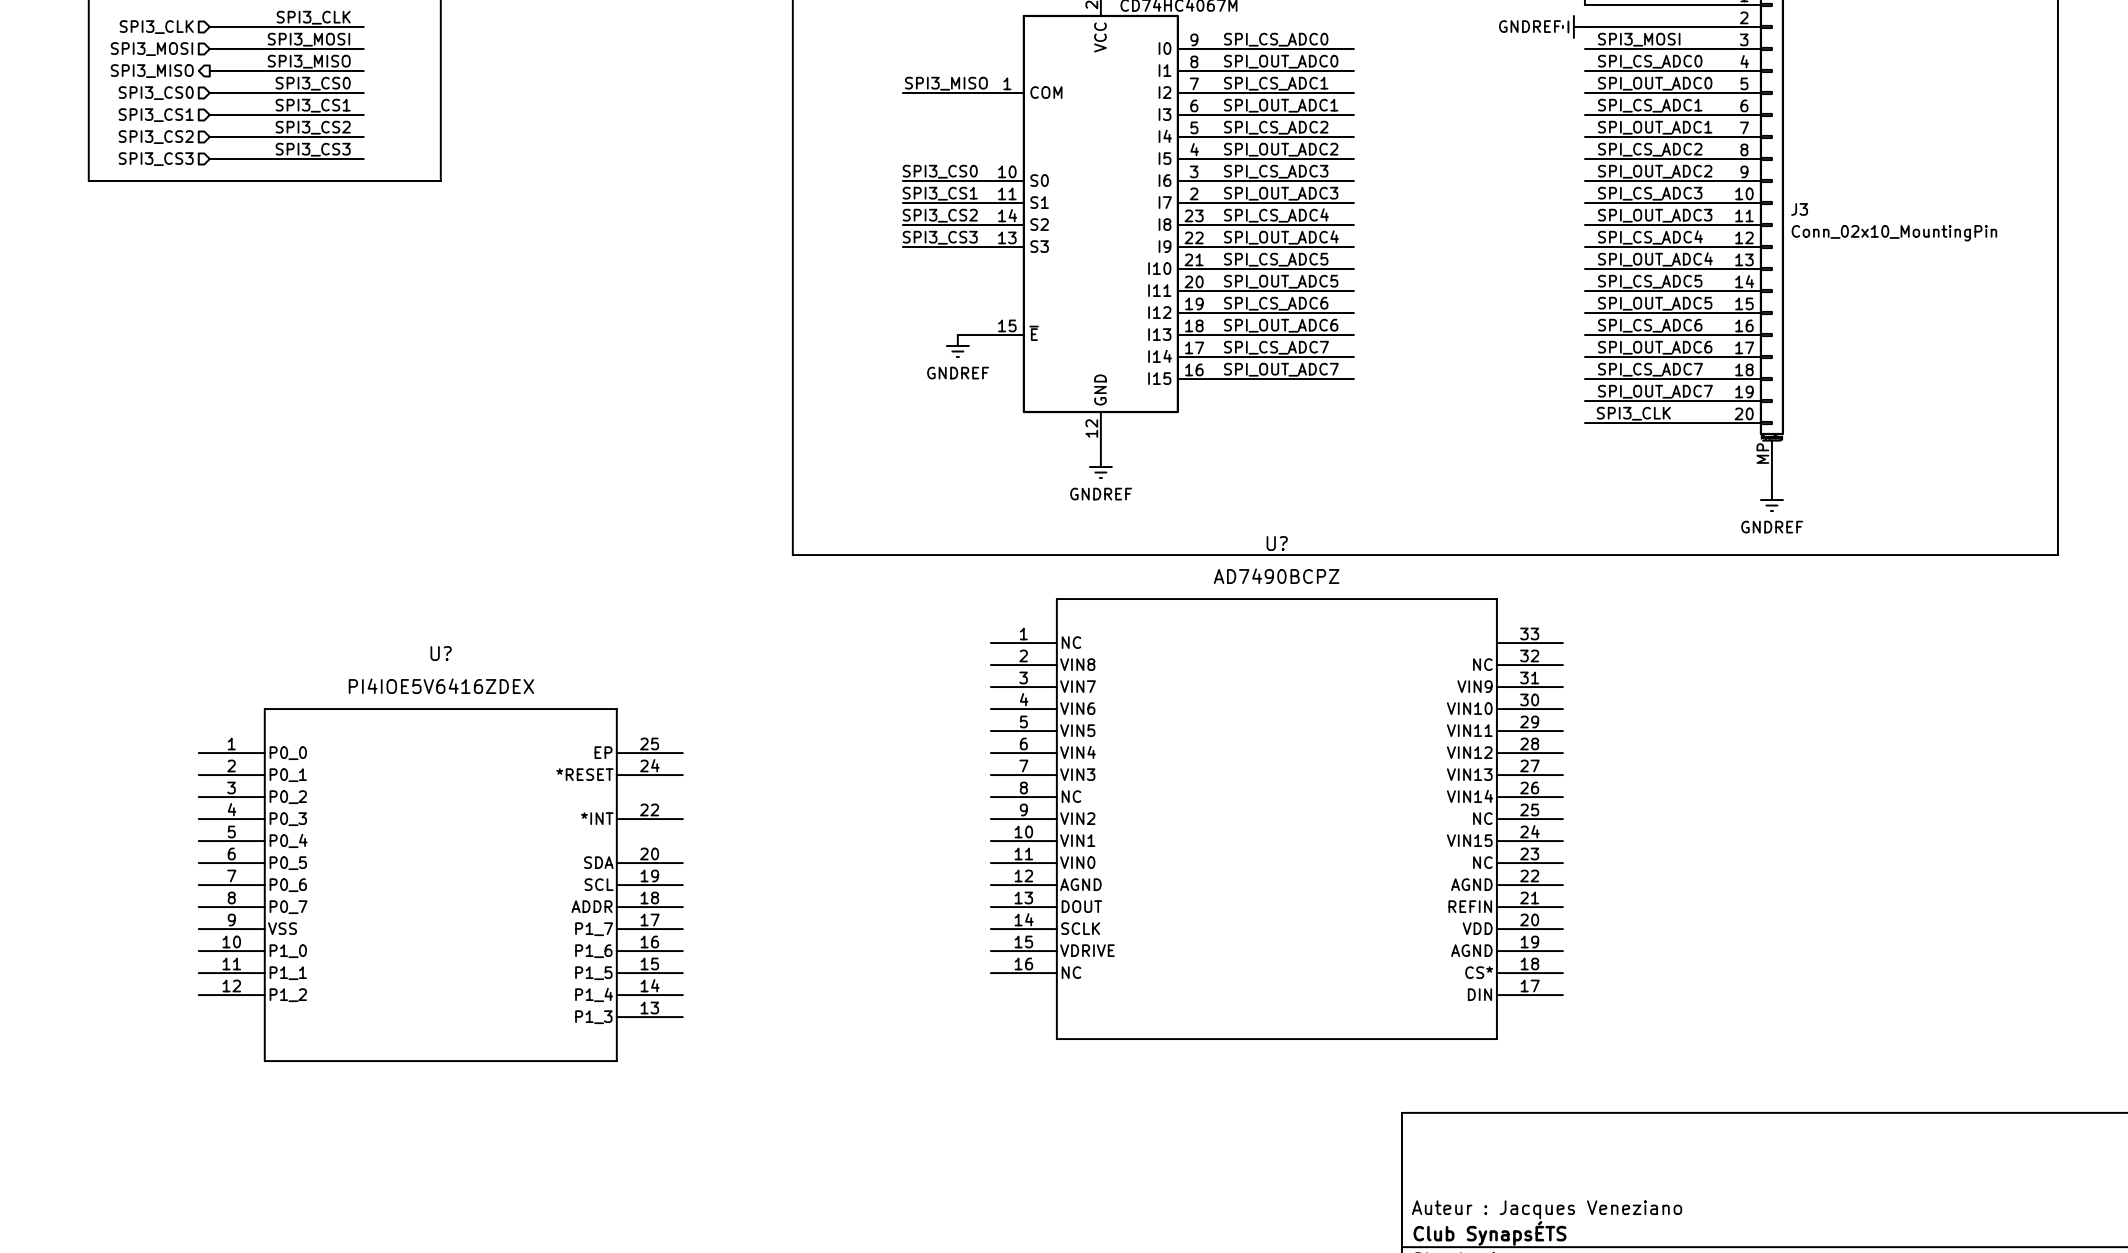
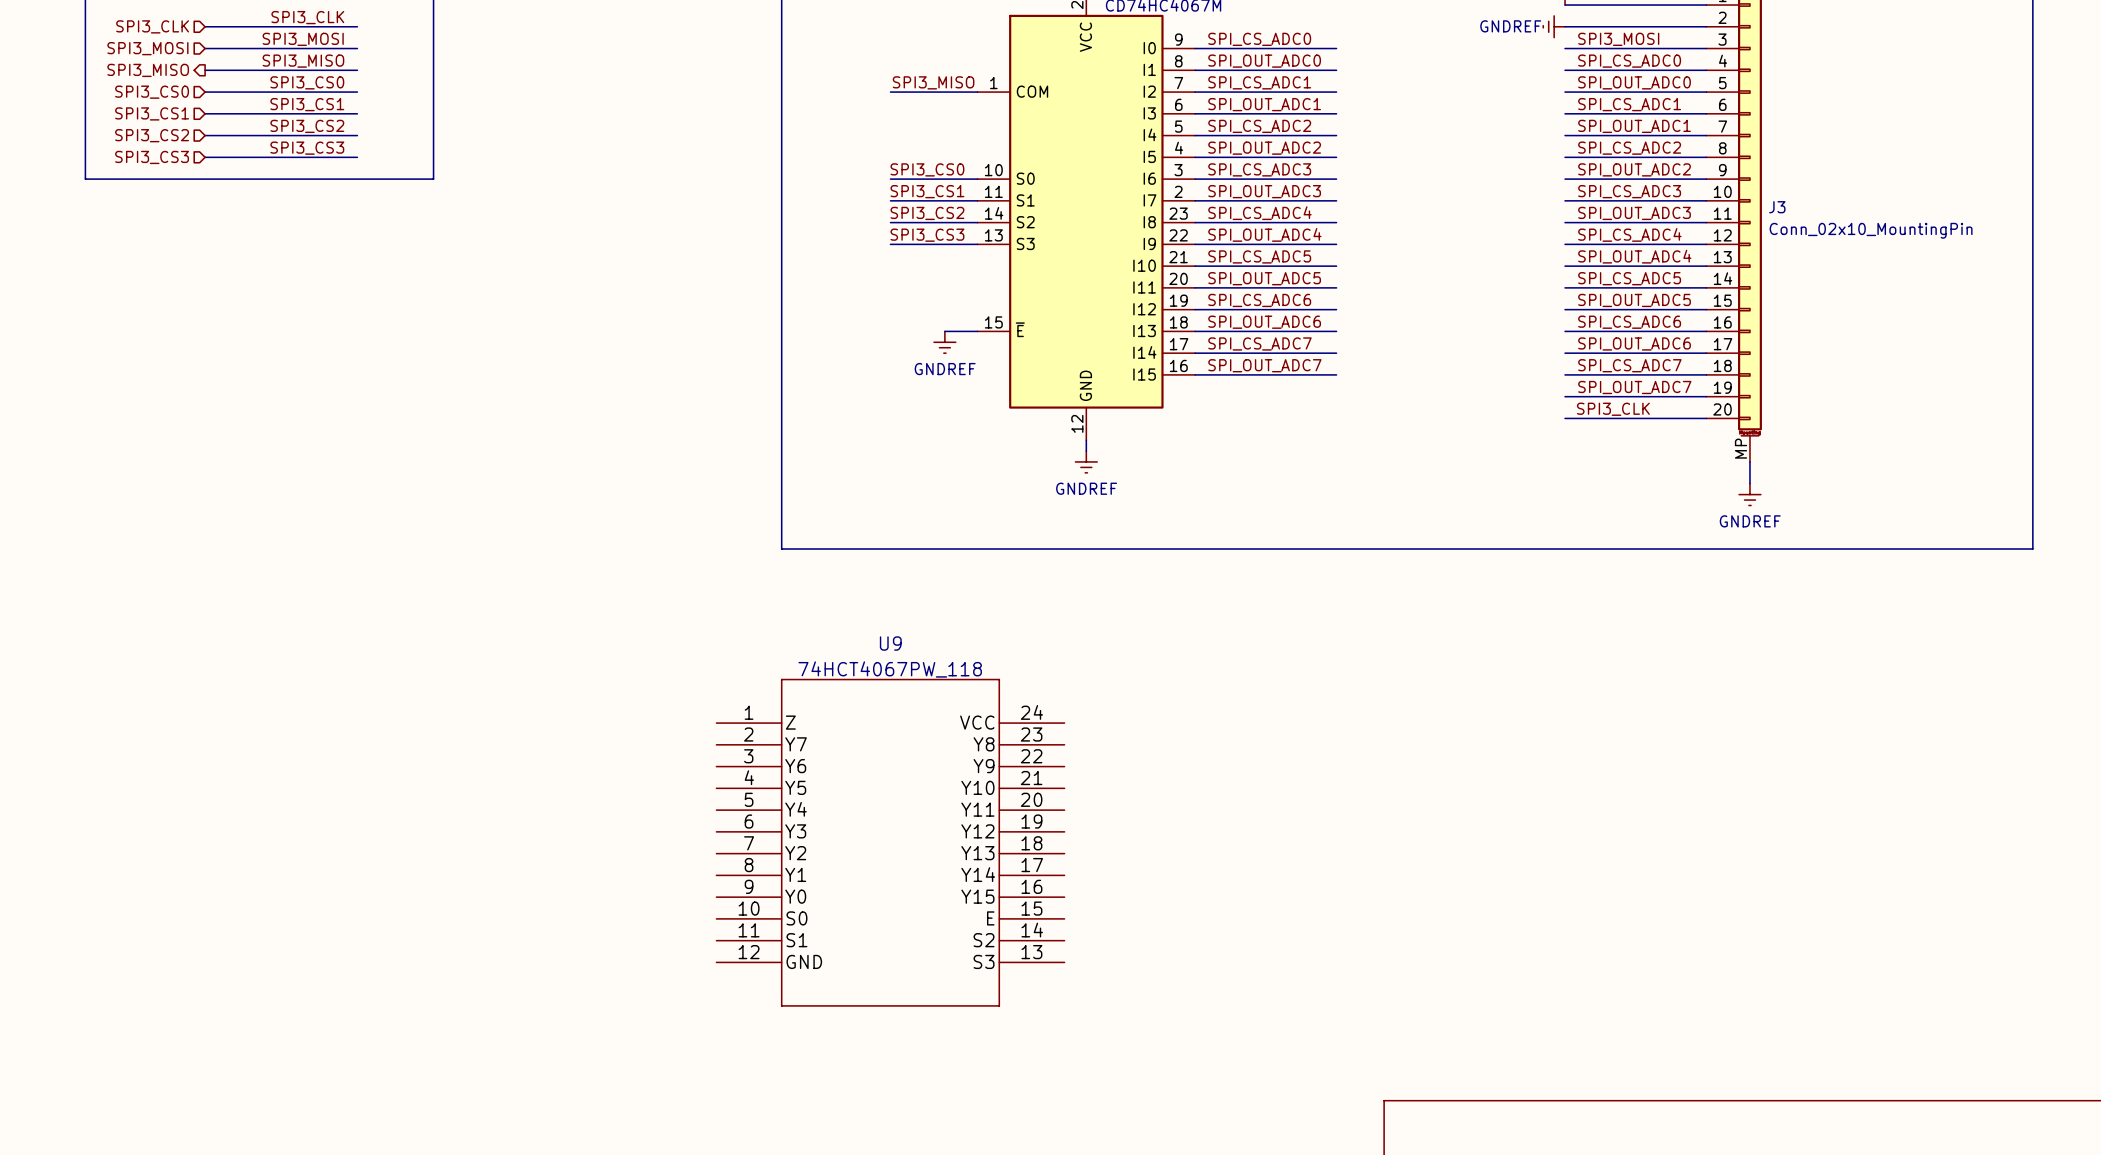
U?: AD7490BCPZ (1276, 819) -> none
U9: none -> 74HCT4067PW_118 (890, 842)
U?: PI4IOE5V6416ZDEX (440, 885) -> none

